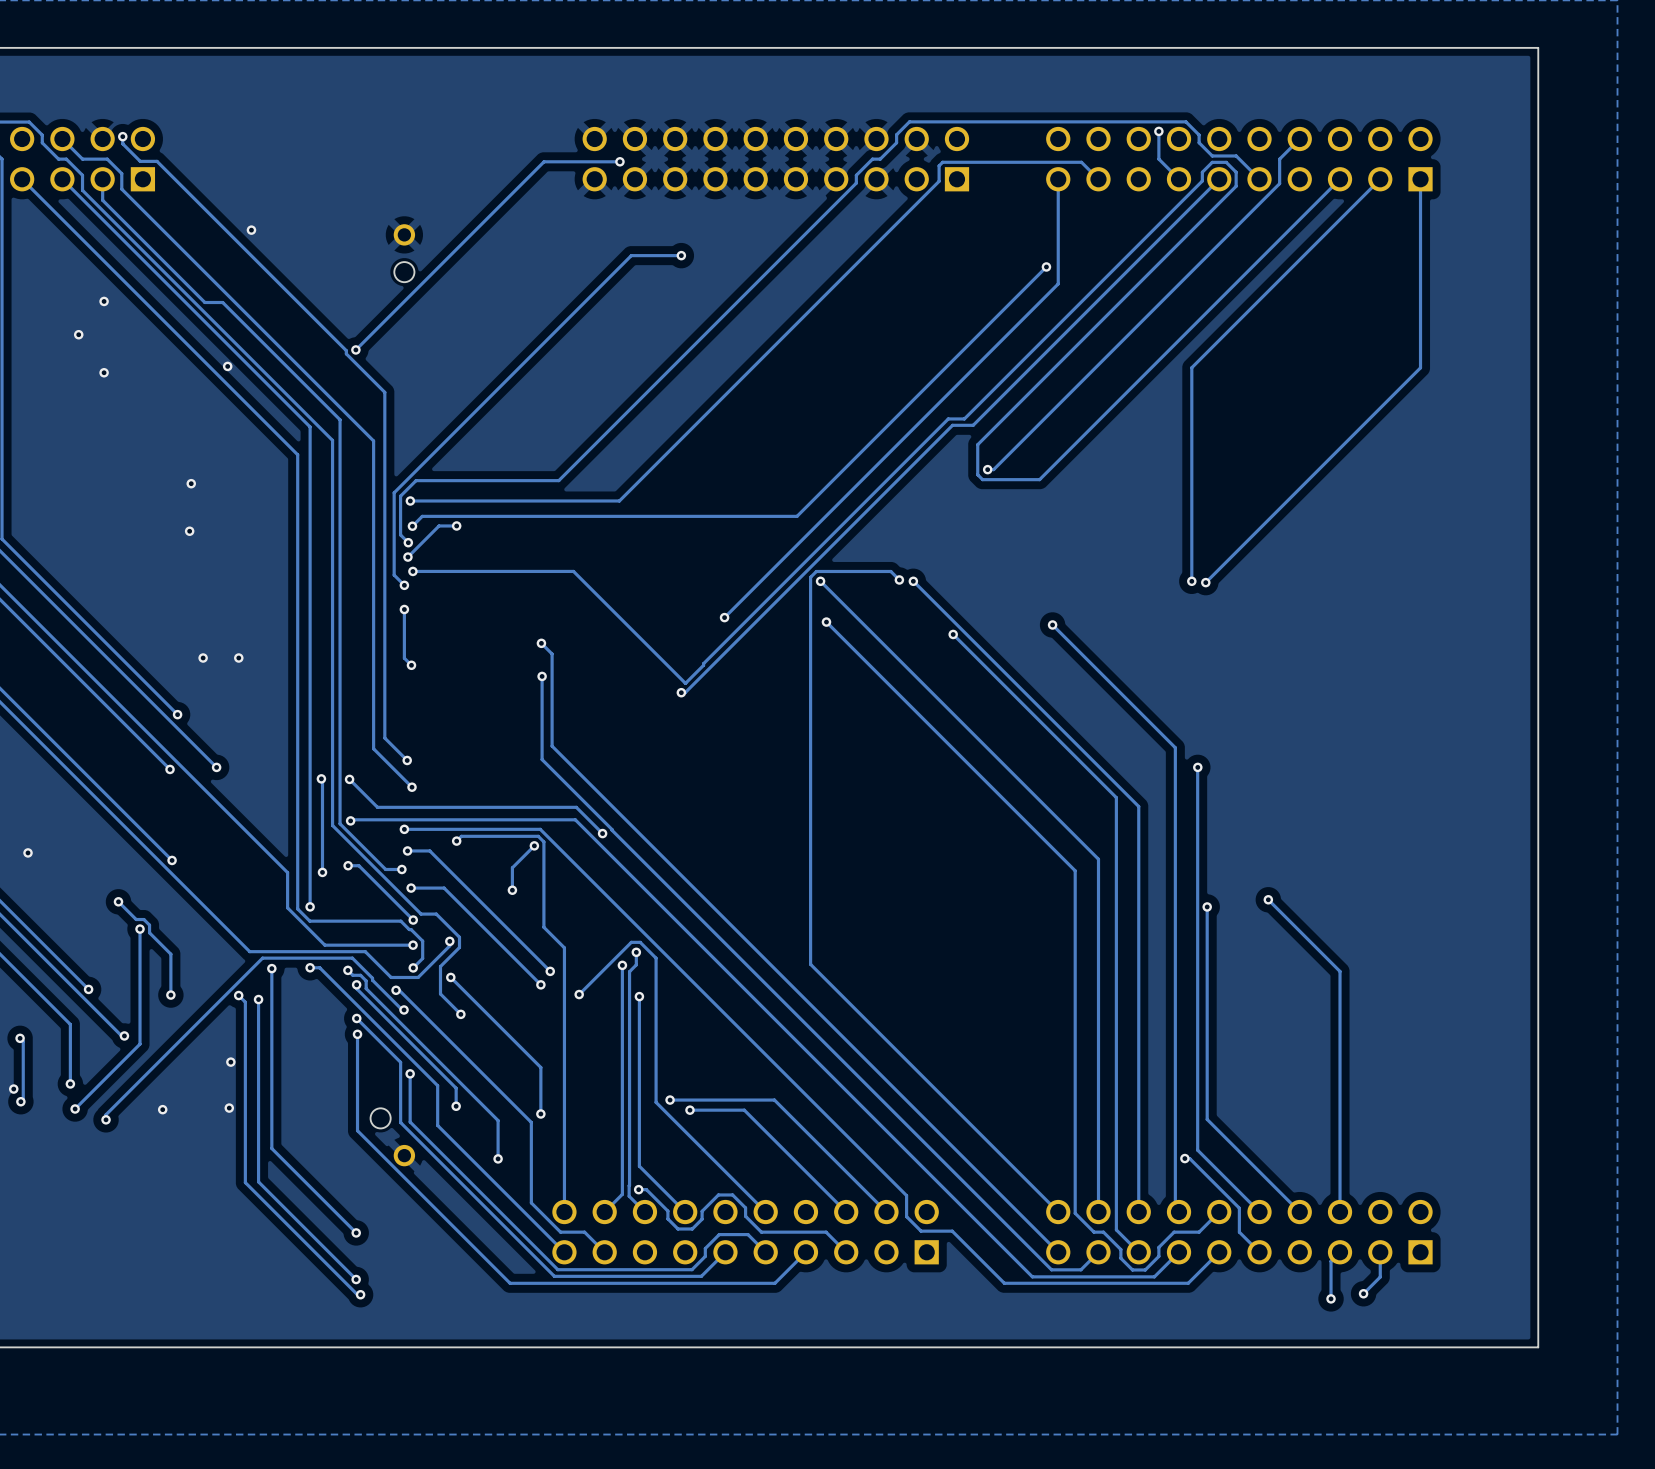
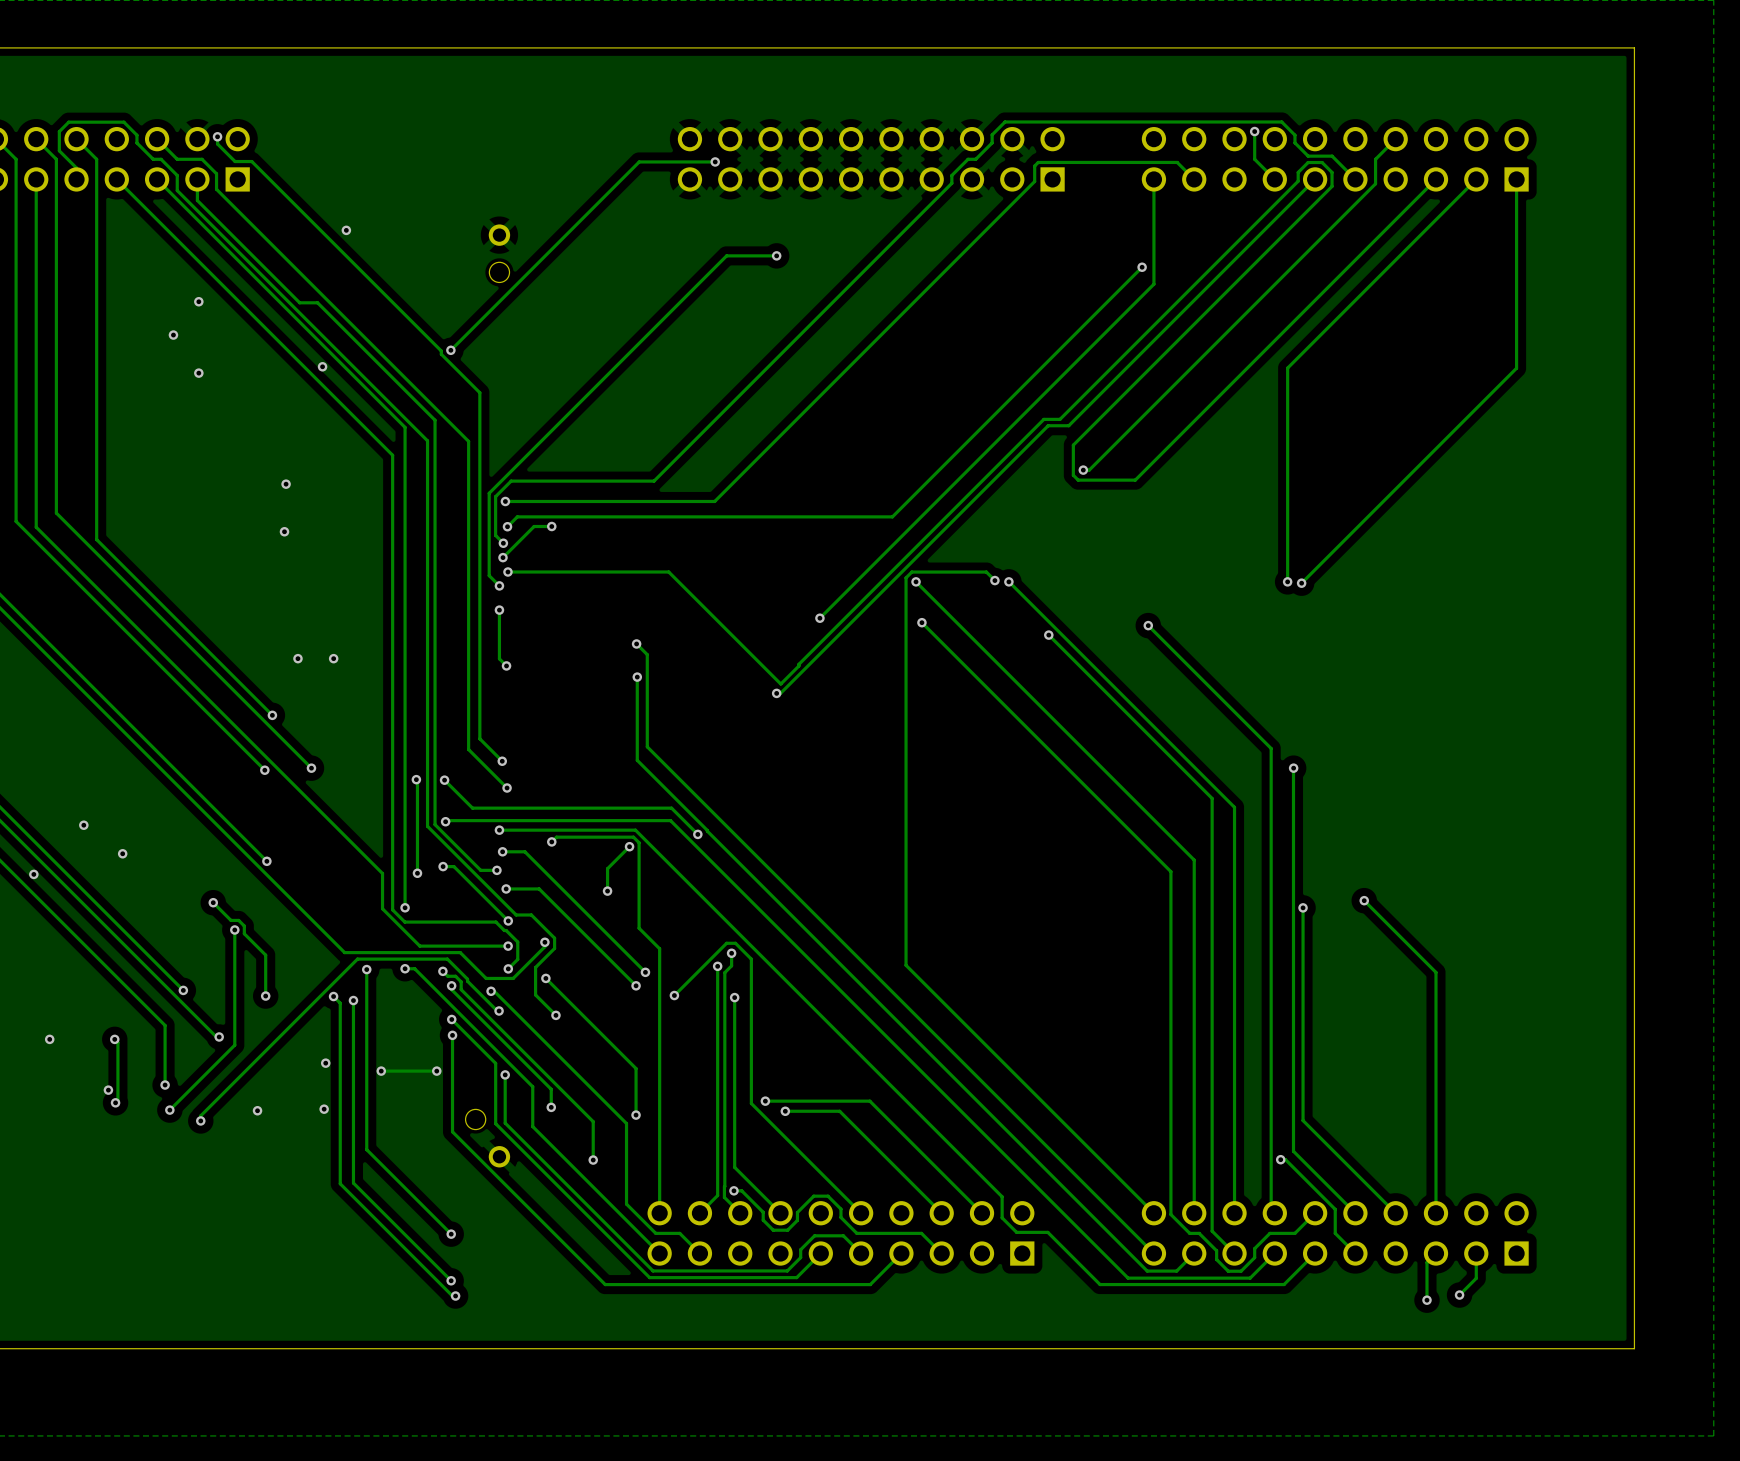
via: none -> (381, 1071)
track: none -> (436, 1071) (381, 1071)
via: none -> (436, 1071)

